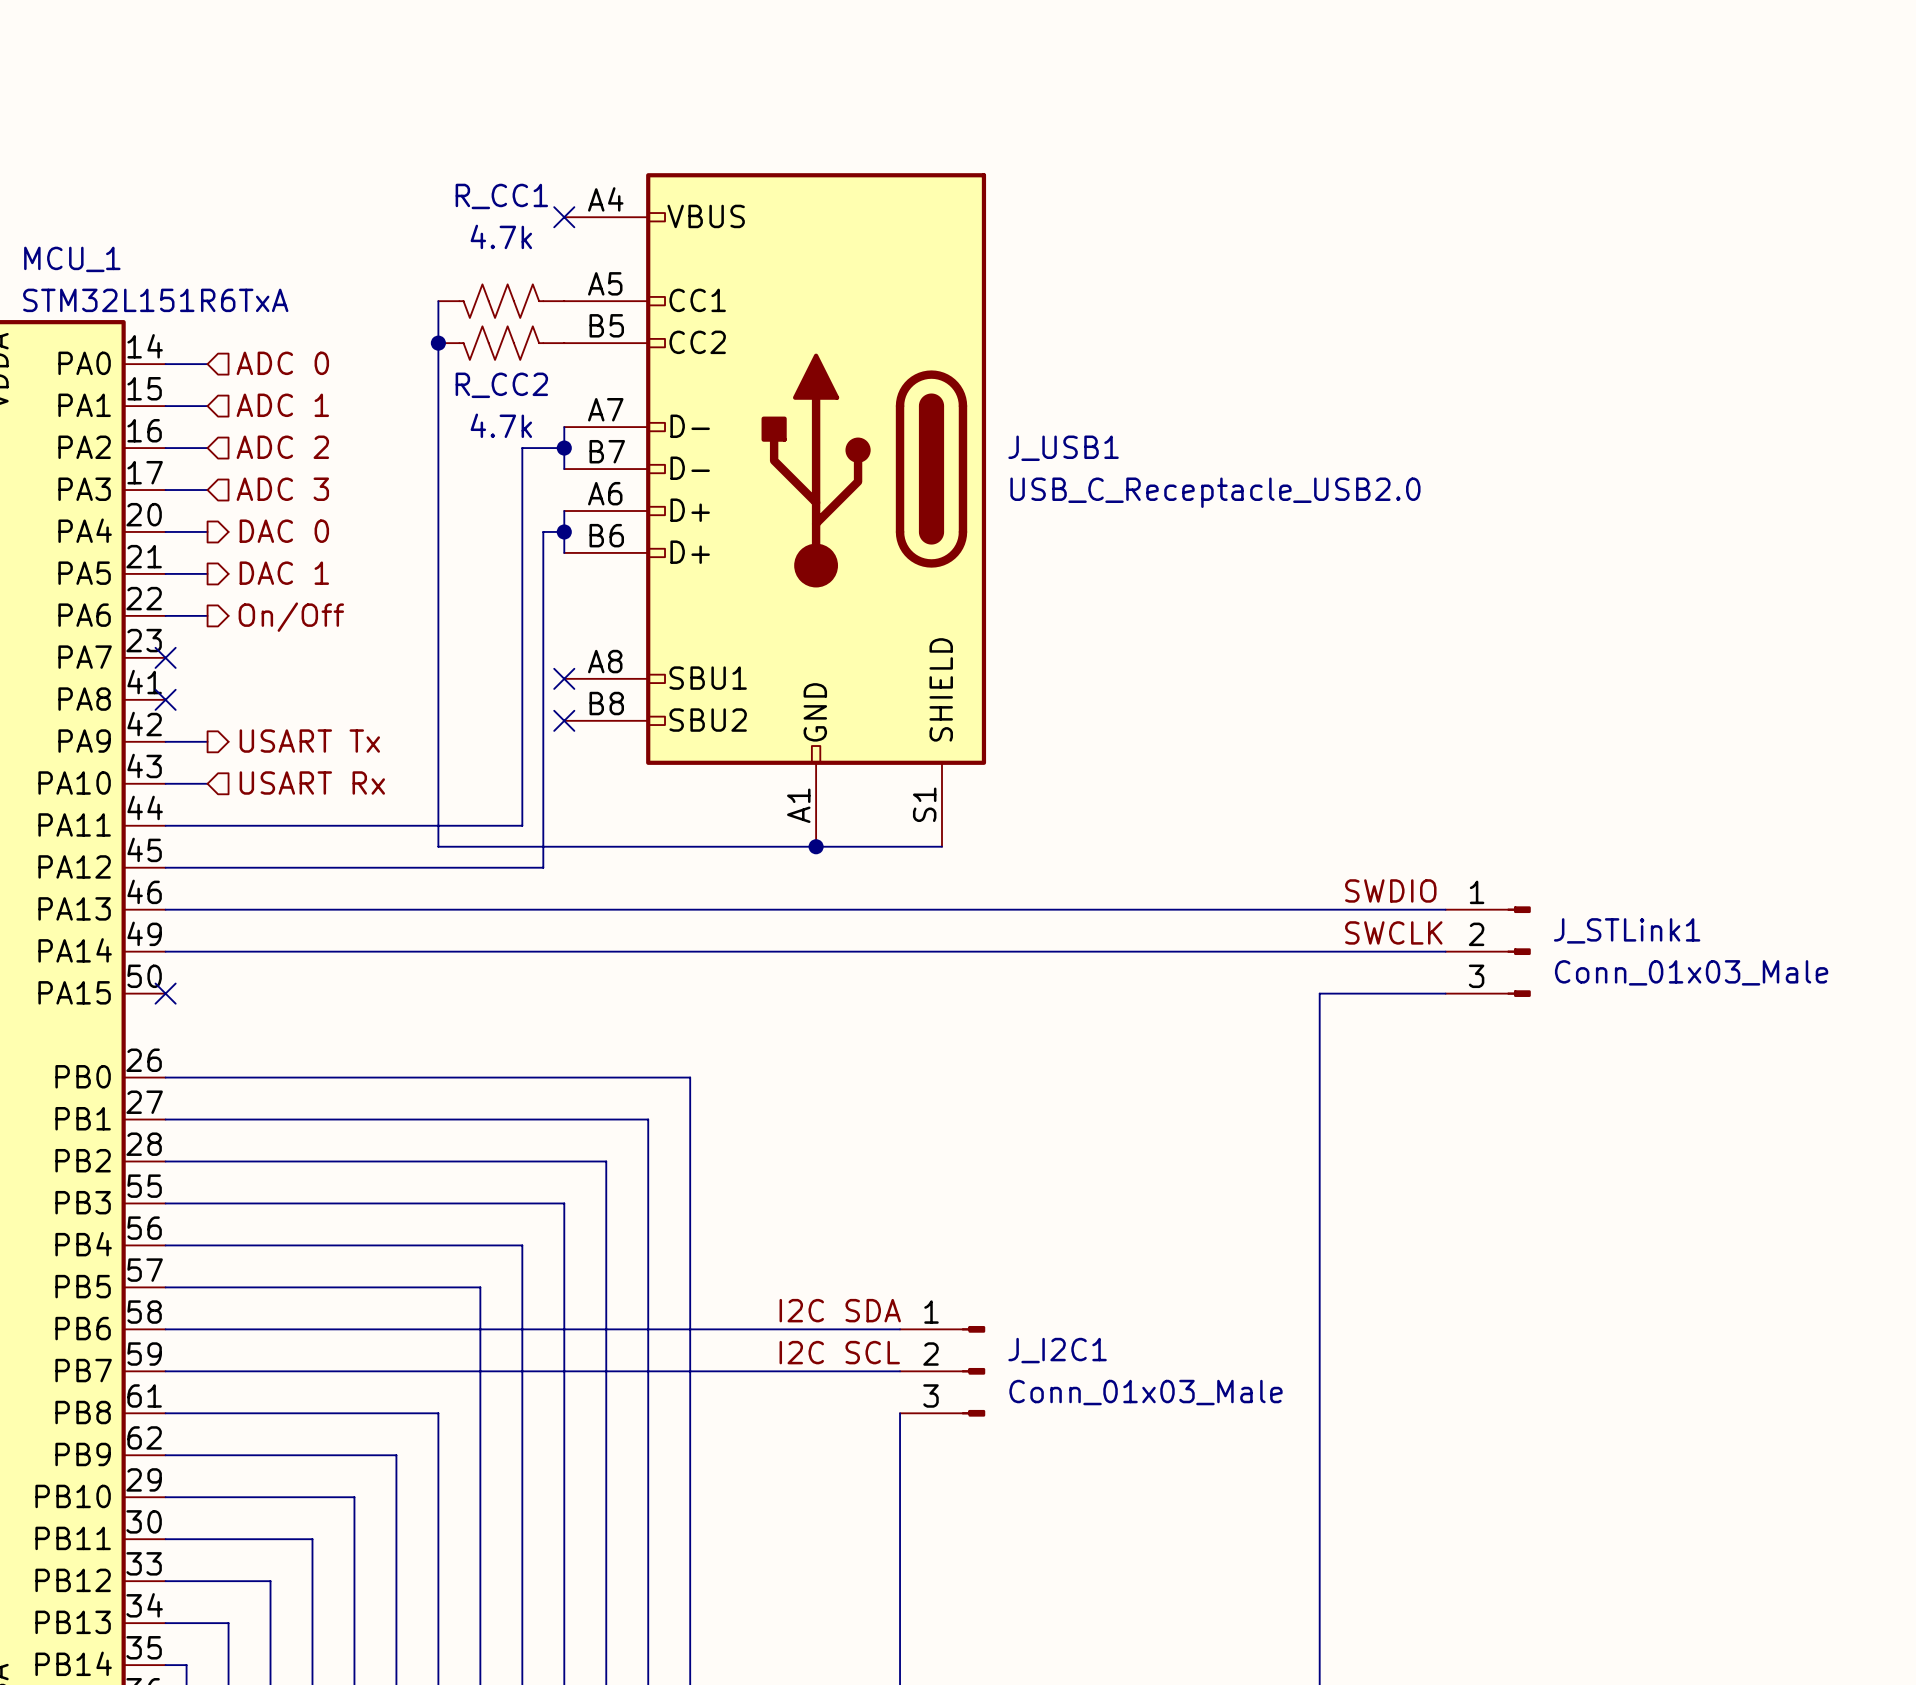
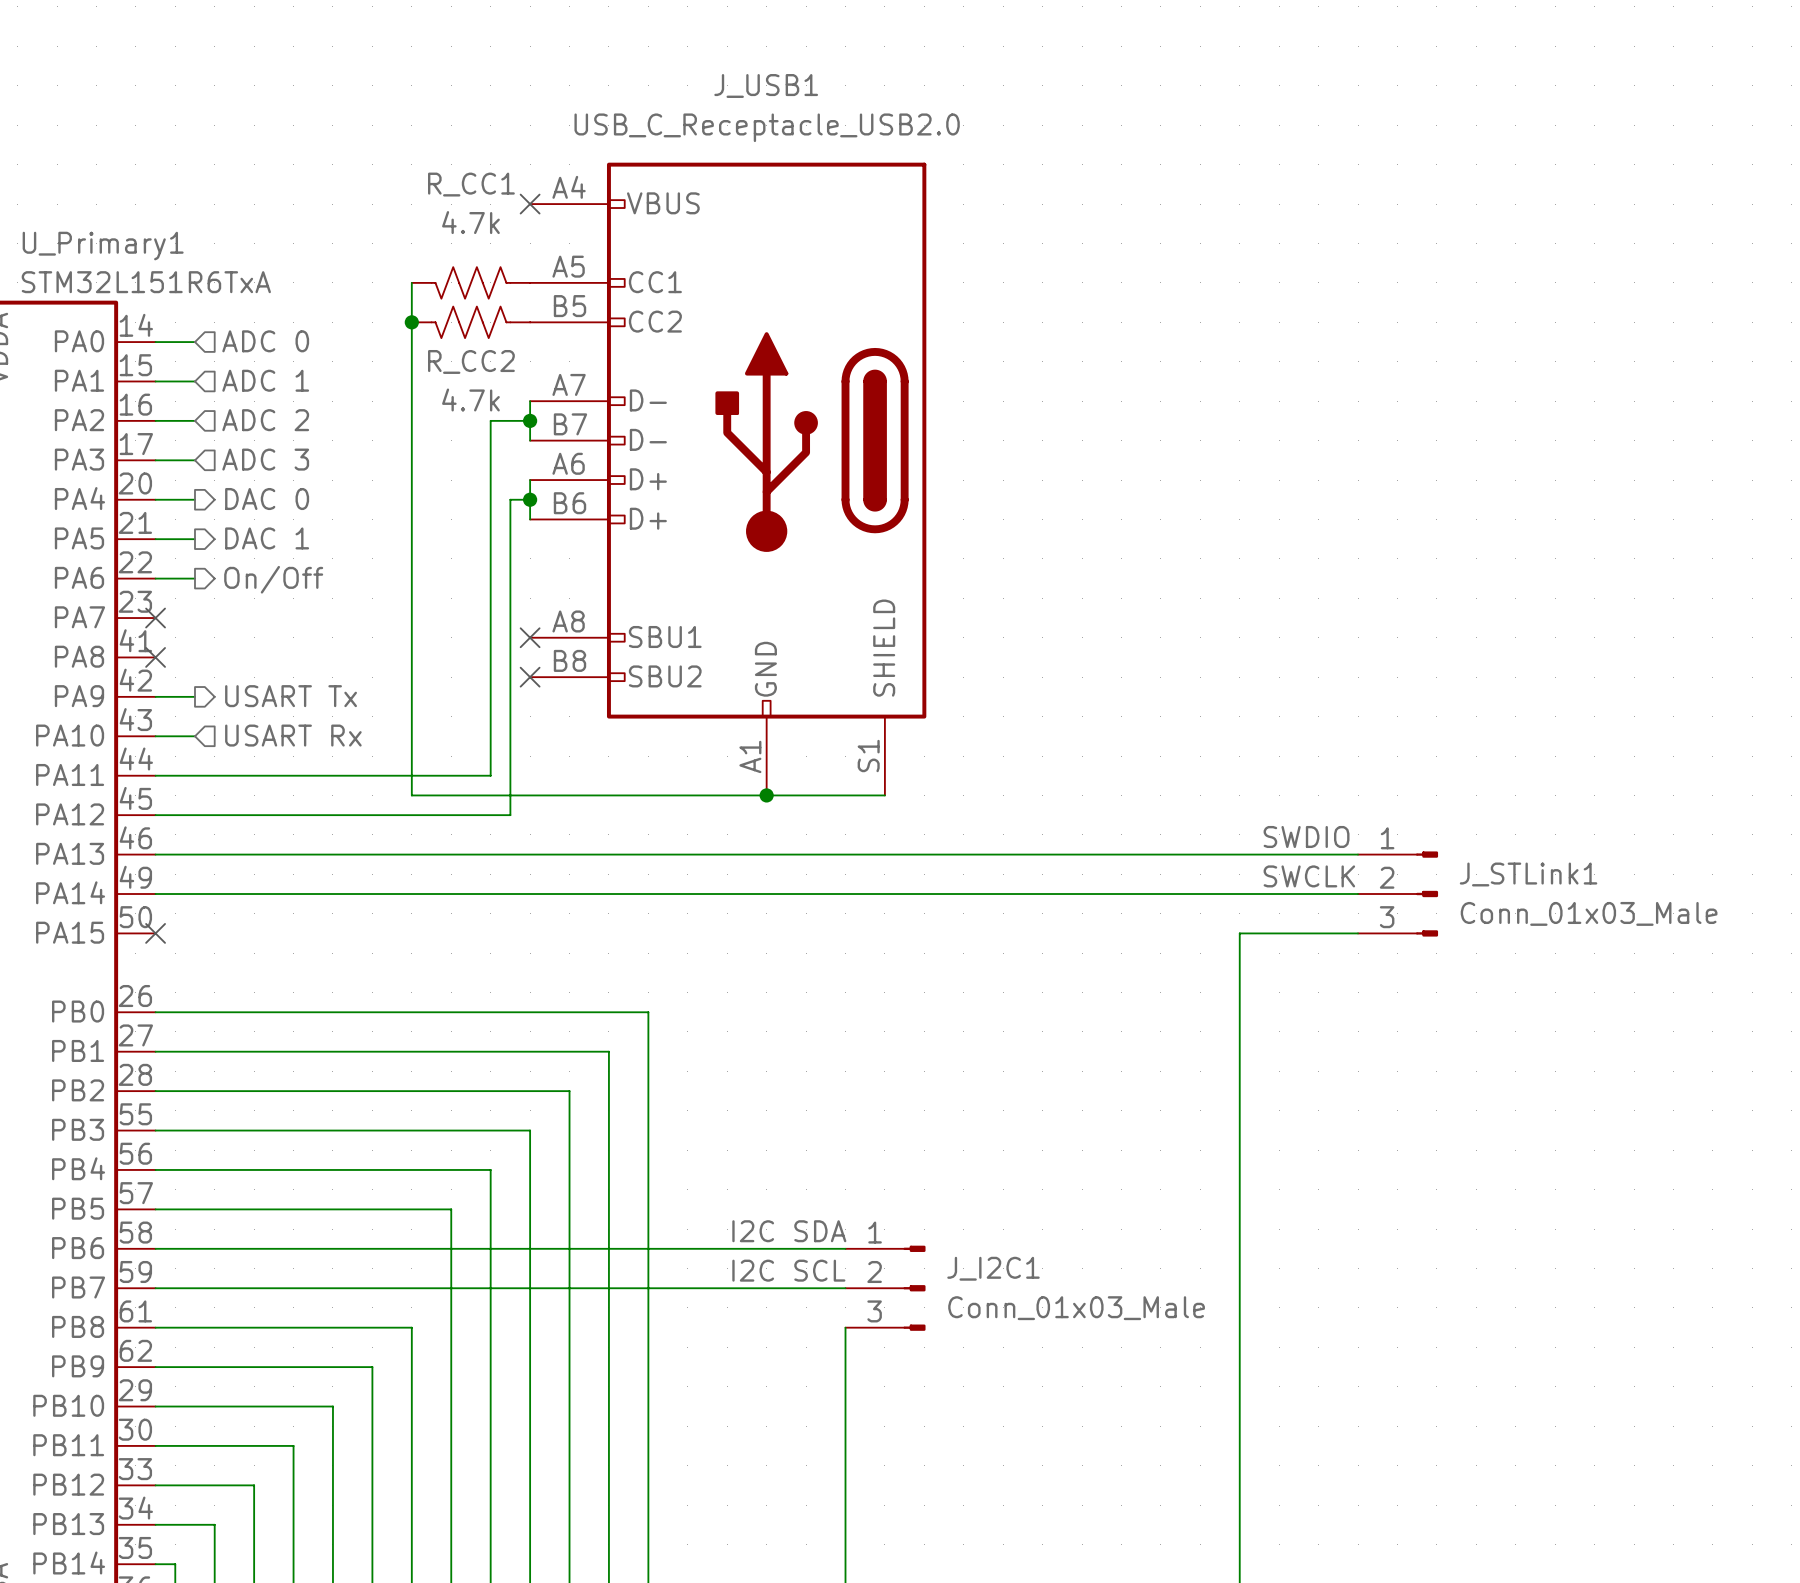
MCU_1 name: MCU_1 (72, 259) -> U_Primary1 (103, 246)
J_USB1 name position: J_USB1 (1063, 448) -> J_USB1 (766, 85)
J_USB1 value position: USB_C_Receptacle_USB2.0 (1215, 492) -> USB_C_Receptacle_USB2.0 (767, 127)

